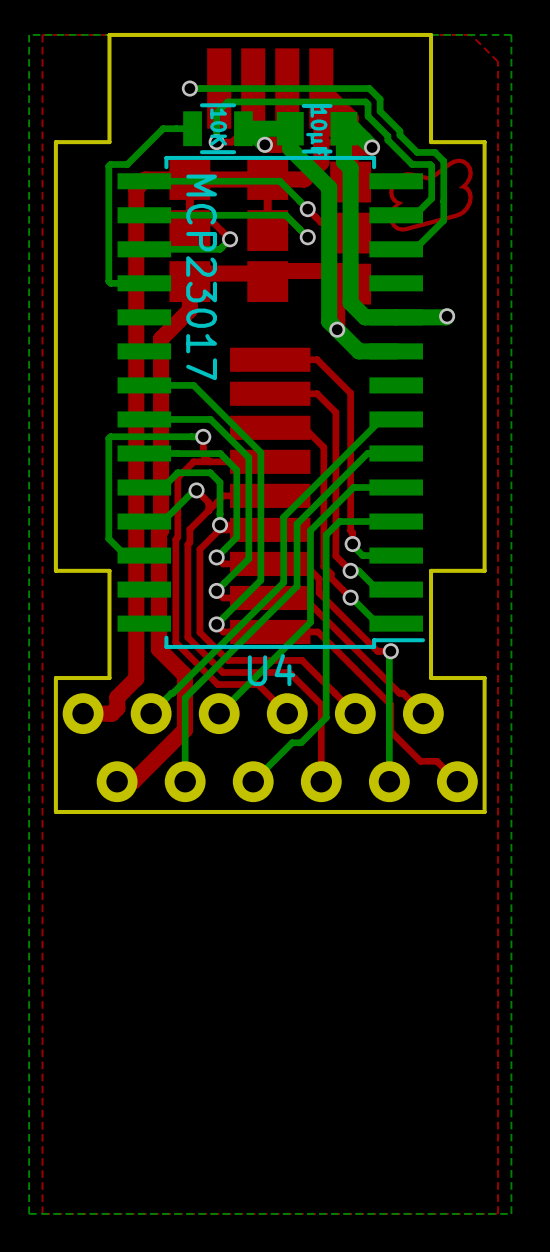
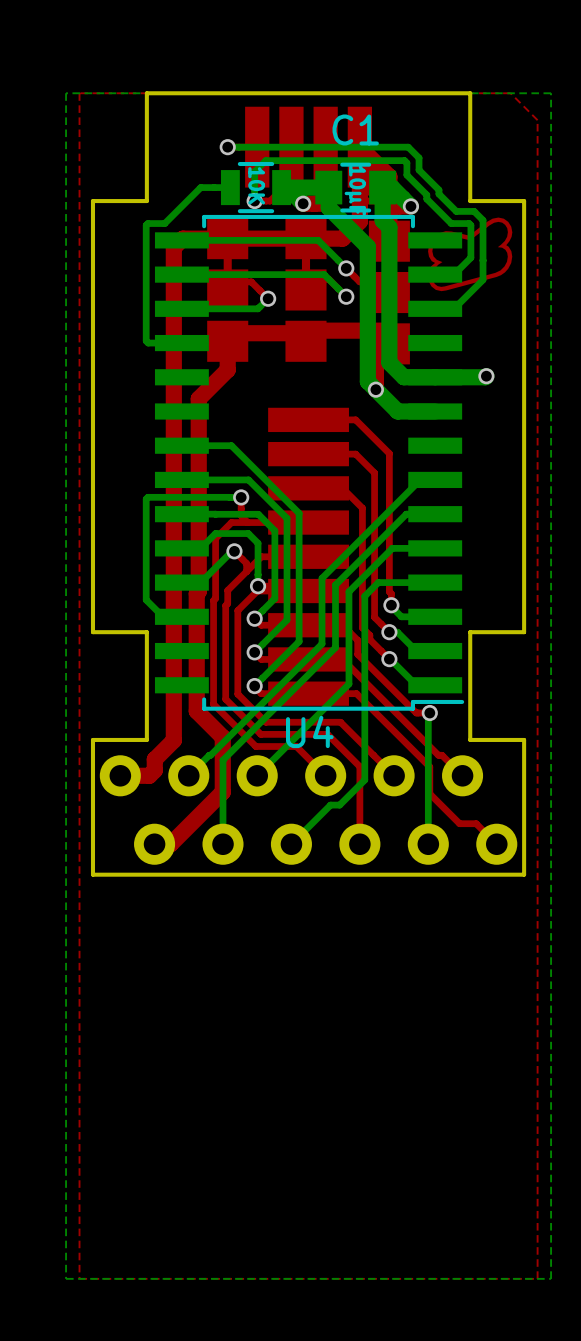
C1 name: none -> C1 (355, 129)
U4 value: MCP23017 (201, 277) -> none

